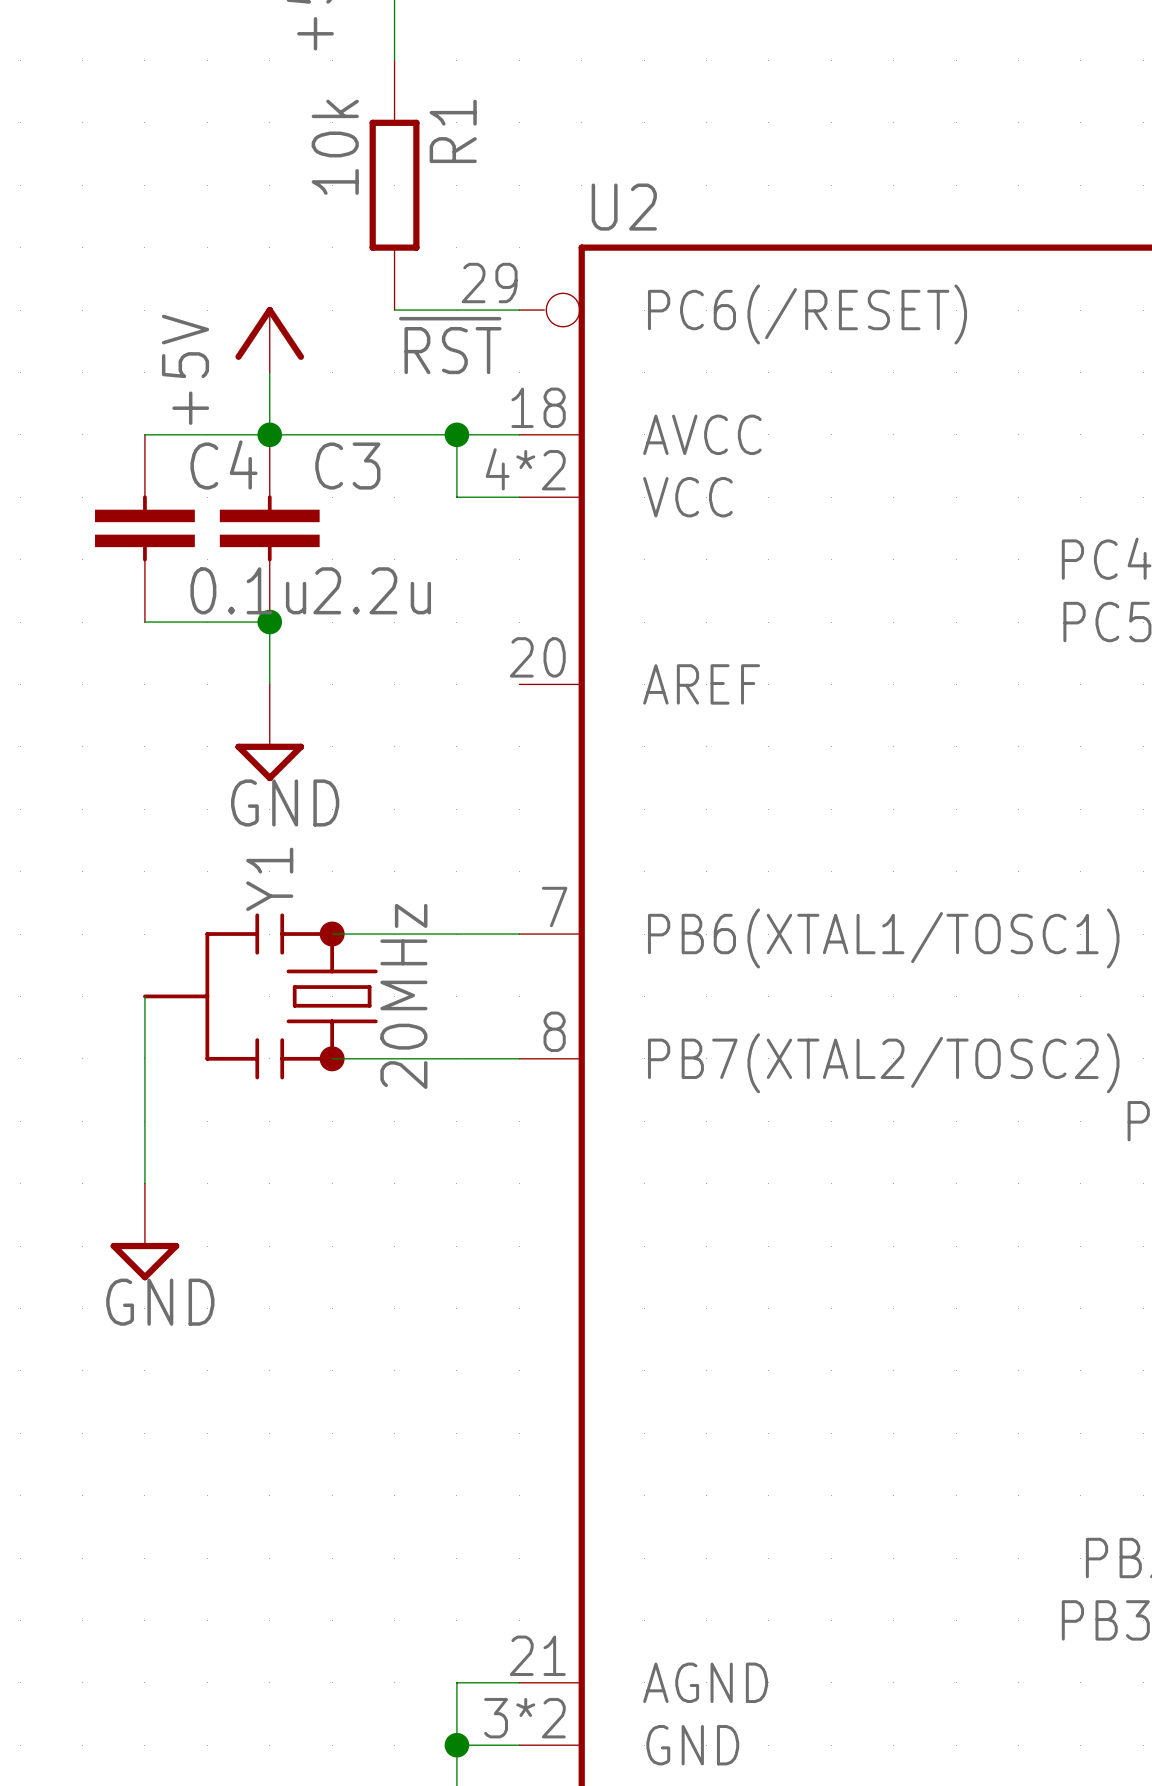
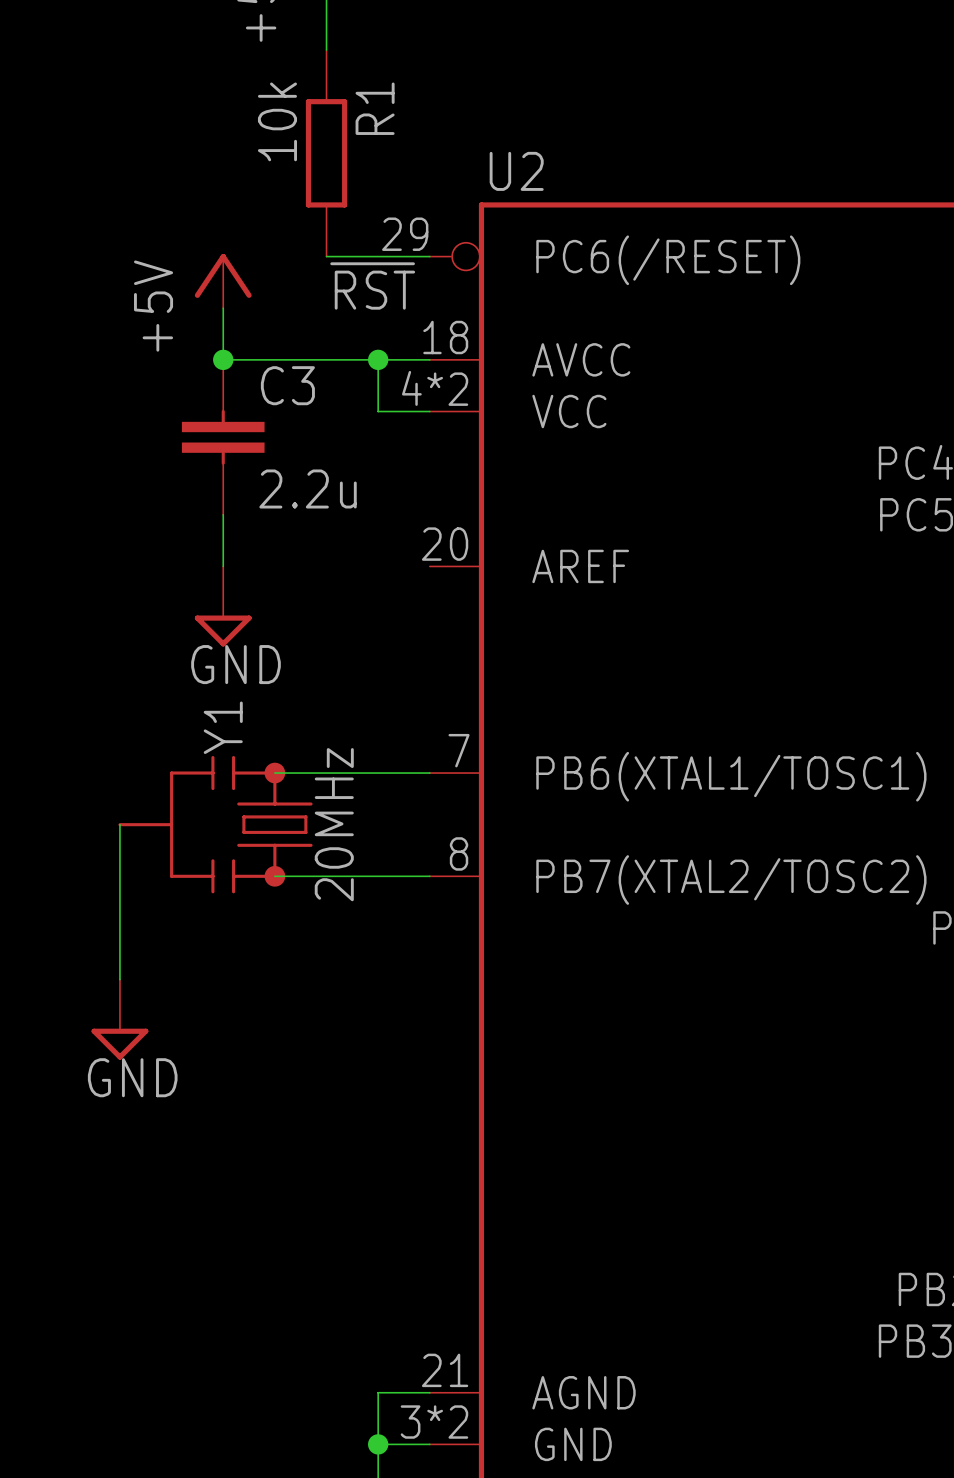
wire: (144, 434) (269, 434) -> none
C4: 0.1u (144, 528) -> none
wire: (144, 622) (269, 622) -> none
junction: (269, 622) -> none

